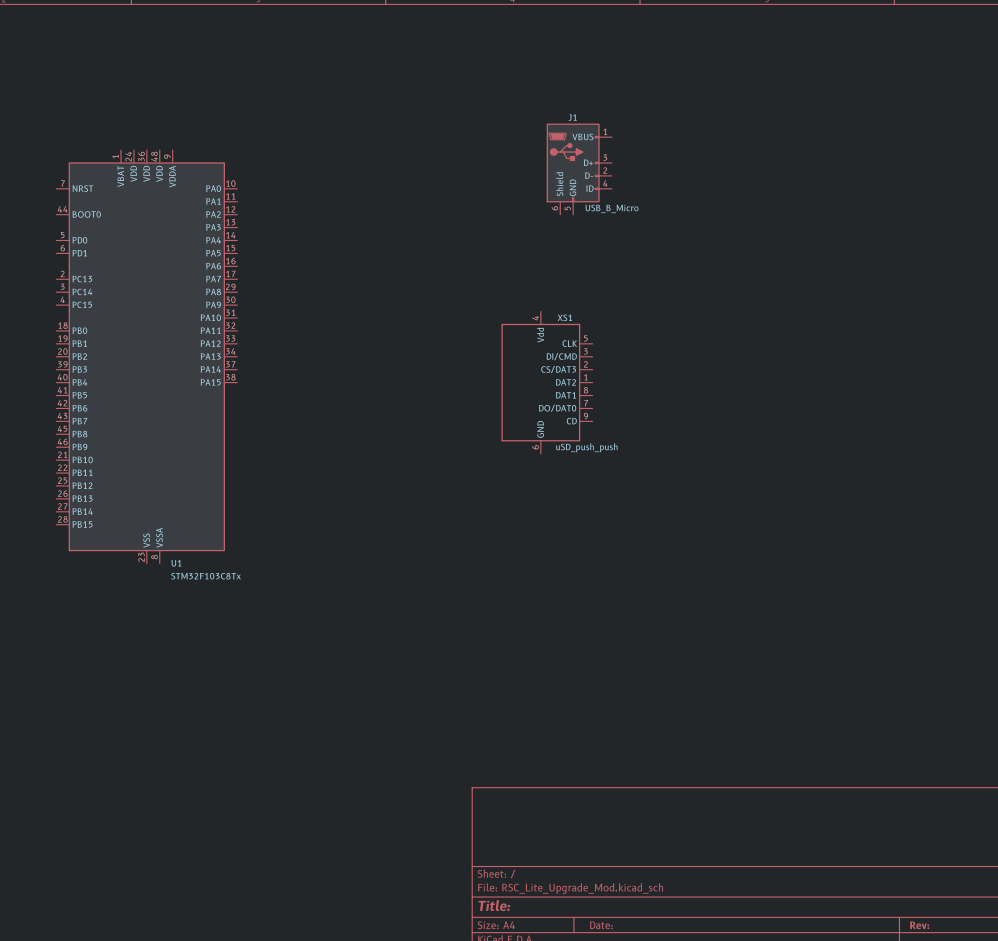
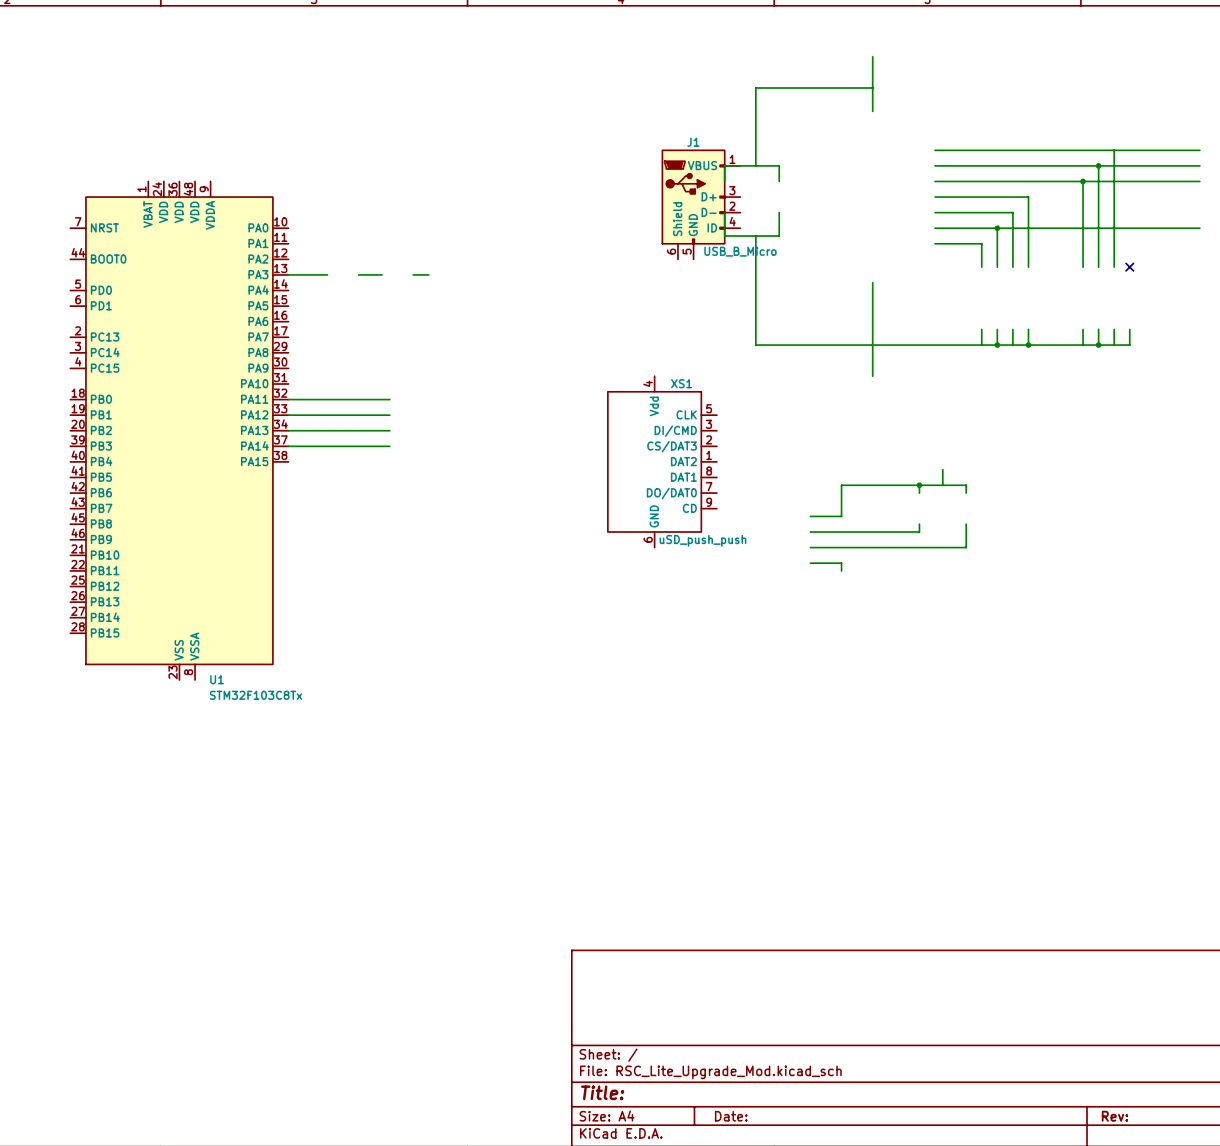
wire: none -> (872, 56) (872, 111)
wire: none -> (872, 88) (755, 88) (755, 165)
wire: none -> (935, 150) (1199, 150)
wire: none -> (1114, 150) (1114, 267)
wire: none -> (935, 165) (1199, 165)
wire: none -> (1098, 165) (1098, 267)
junction: none -> (1098, 165)
wire: none -> (724, 181) (724, 165) (779, 165) (779, 181)
wire: none -> (935, 181) (1199, 181)
wire: none -> (1083, 181) (1083, 267)
junction: none -> (1083, 181)
wire: none -> (935, 197) (1028, 197) (1028, 267)
wire: none -> (724, 212) (724, 236) (779, 236) (779, 212)
wire: none -> (935, 212) (1012, 212) (1012, 267)
wire: none -> (935, 228) (1199, 228)
wire: none -> (997, 228) (997, 267)
junction: none -> (997, 228)
wire: none -> (755, 236) (755, 345) (1129, 345) (1129, 329)
wire: none -> (935, 243) (981, 243) (981, 267)
no-connect mark: none -> (1129, 267)
wire: none -> (288, 274) (327, 274)
wire: none -> (358, 274) (381, 274)
wire: none -> (413, 274) (428, 274)
wire: none -> (872, 282) (872, 376)
wire: none -> (981, 329) (981, 345)
wire: none -> (997, 329) (997, 345)
wire: none -> (1012, 329) (1012, 345)
wire: none -> (1028, 329) (1028, 345)
wire: none -> (1083, 329) (1083, 345)
wire: none -> (1098, 329) (1098, 345)
wire: none -> (1114, 329) (1114, 345)
junction: none -> (997, 345)
junction: none -> (1028, 345)
junction: none -> (1098, 345)
wire: none -> (288, 399) (389, 399)
wire: none -> (288, 415) (389, 415)
wire: none -> (288, 430) (389, 430)
wire: none -> (288, 446) (389, 446)
wire: none -> (942, 469) (942, 485)
wire: none -> (919, 485) (919, 493)
junction: none -> (919, 485)
wire: none -> (966, 493) (966, 485) (841, 485) (841, 516) (810, 516)
wire: none -> (919, 524) (919, 532) (810, 532)
wire: none -> (966, 524) (966, 547) (810, 547)
wire: none -> (810, 563) (841, 563) (841, 570)

